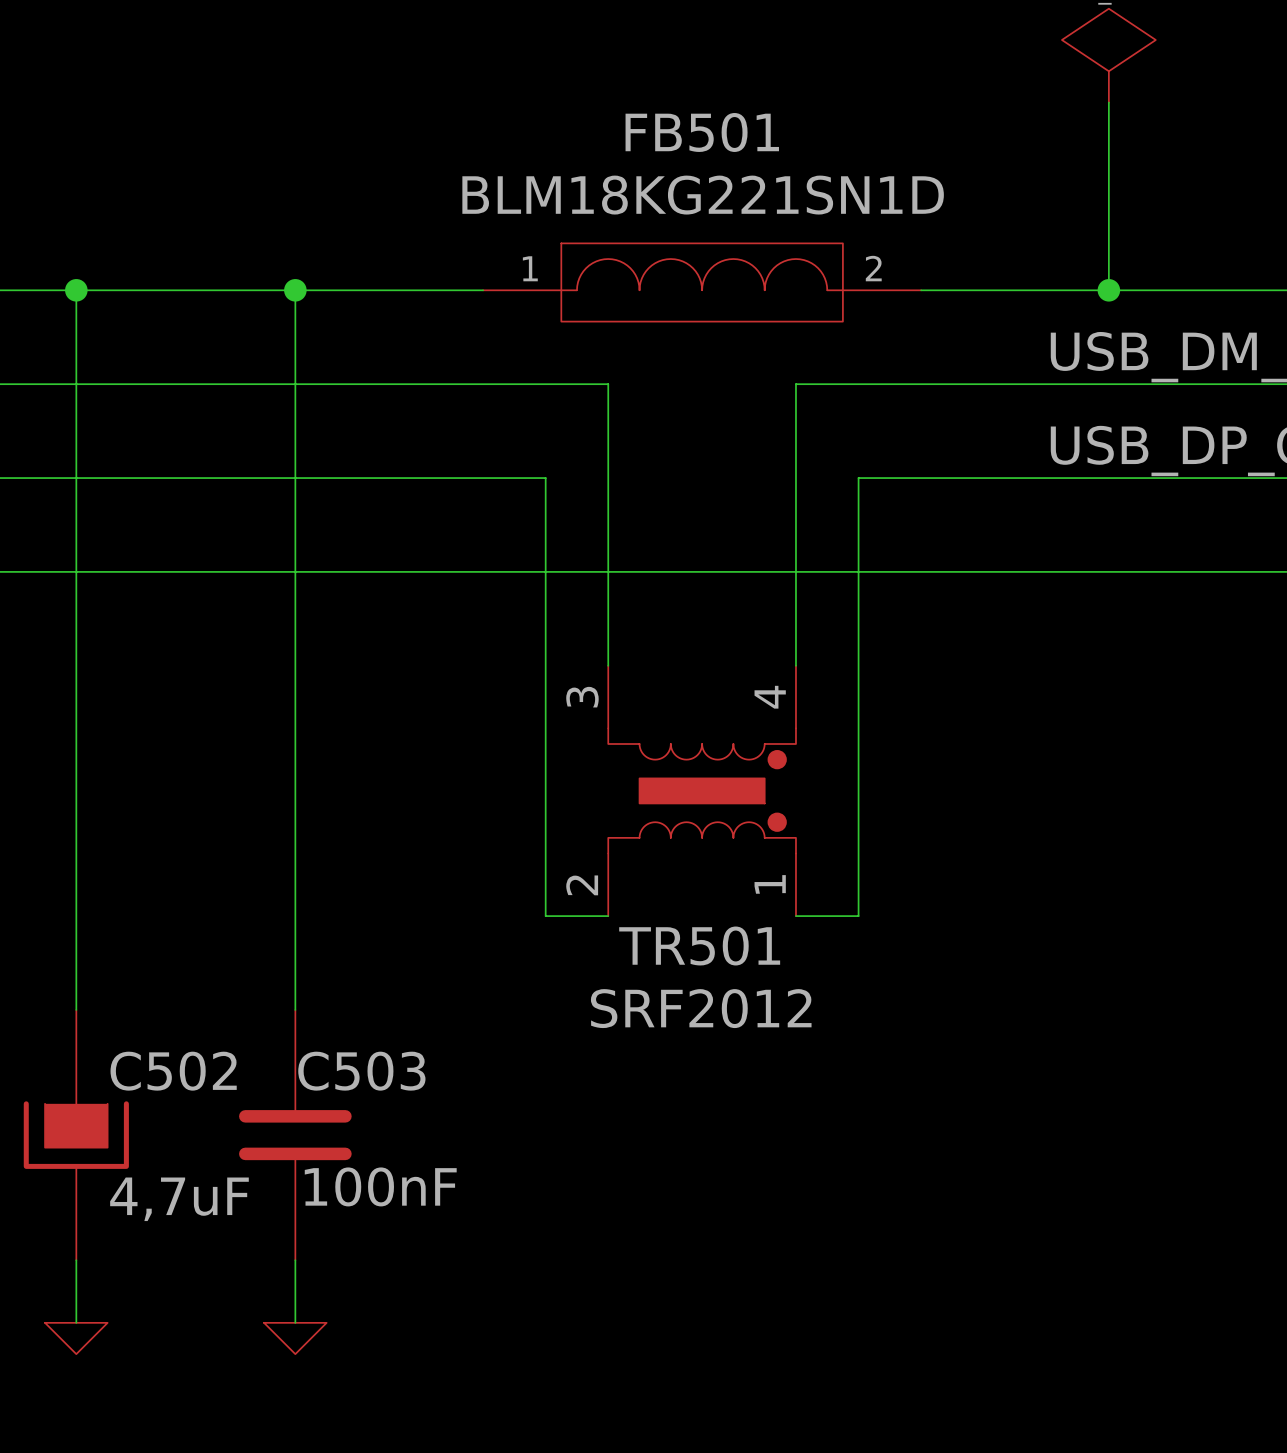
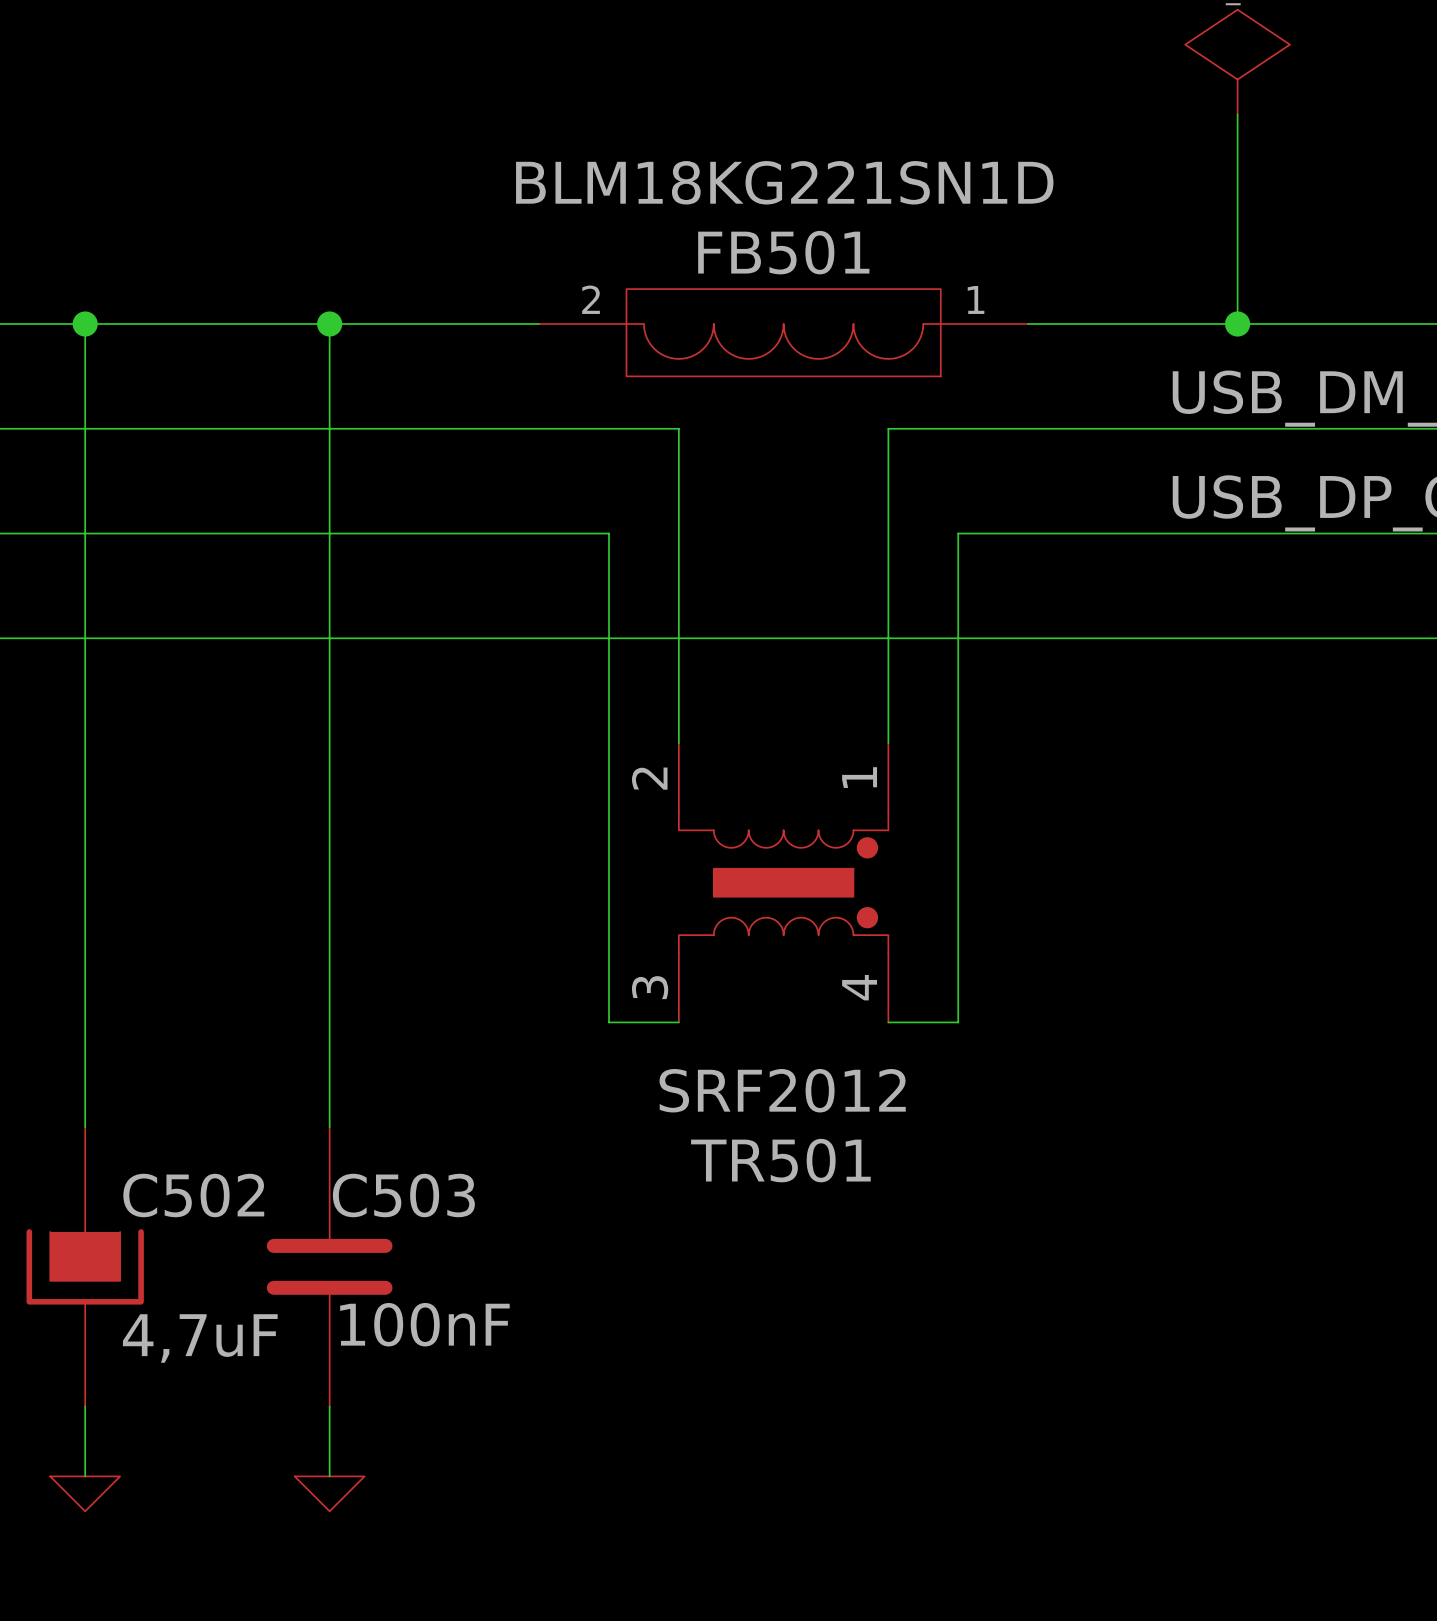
FB501 name position: FB501 (702, 132) -> FB501 (783, 252)
FB501 rotation: 0° (702, 282) -> 180° (783, 332)
TR501 flip: as is (702, 790) -> up-down (783, 882)
TR501 name position: TR501 (699, 946) -> TR501 (780, 1160)

